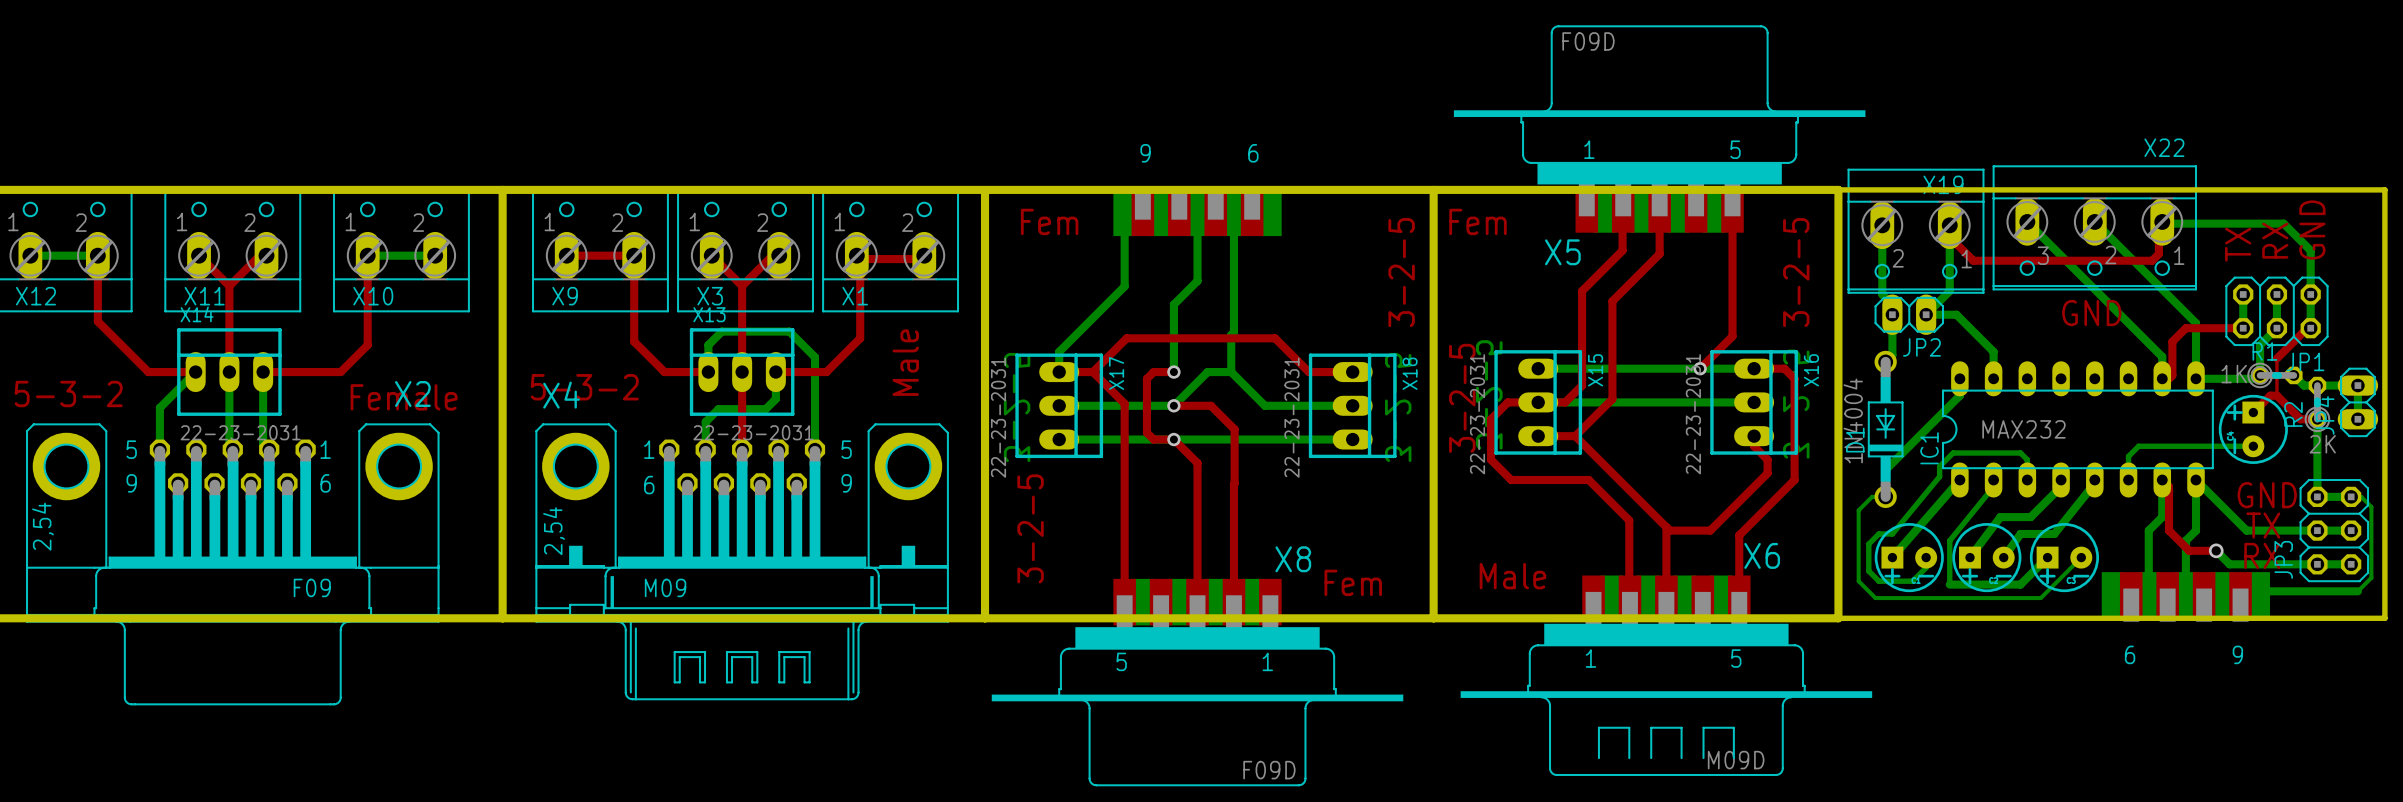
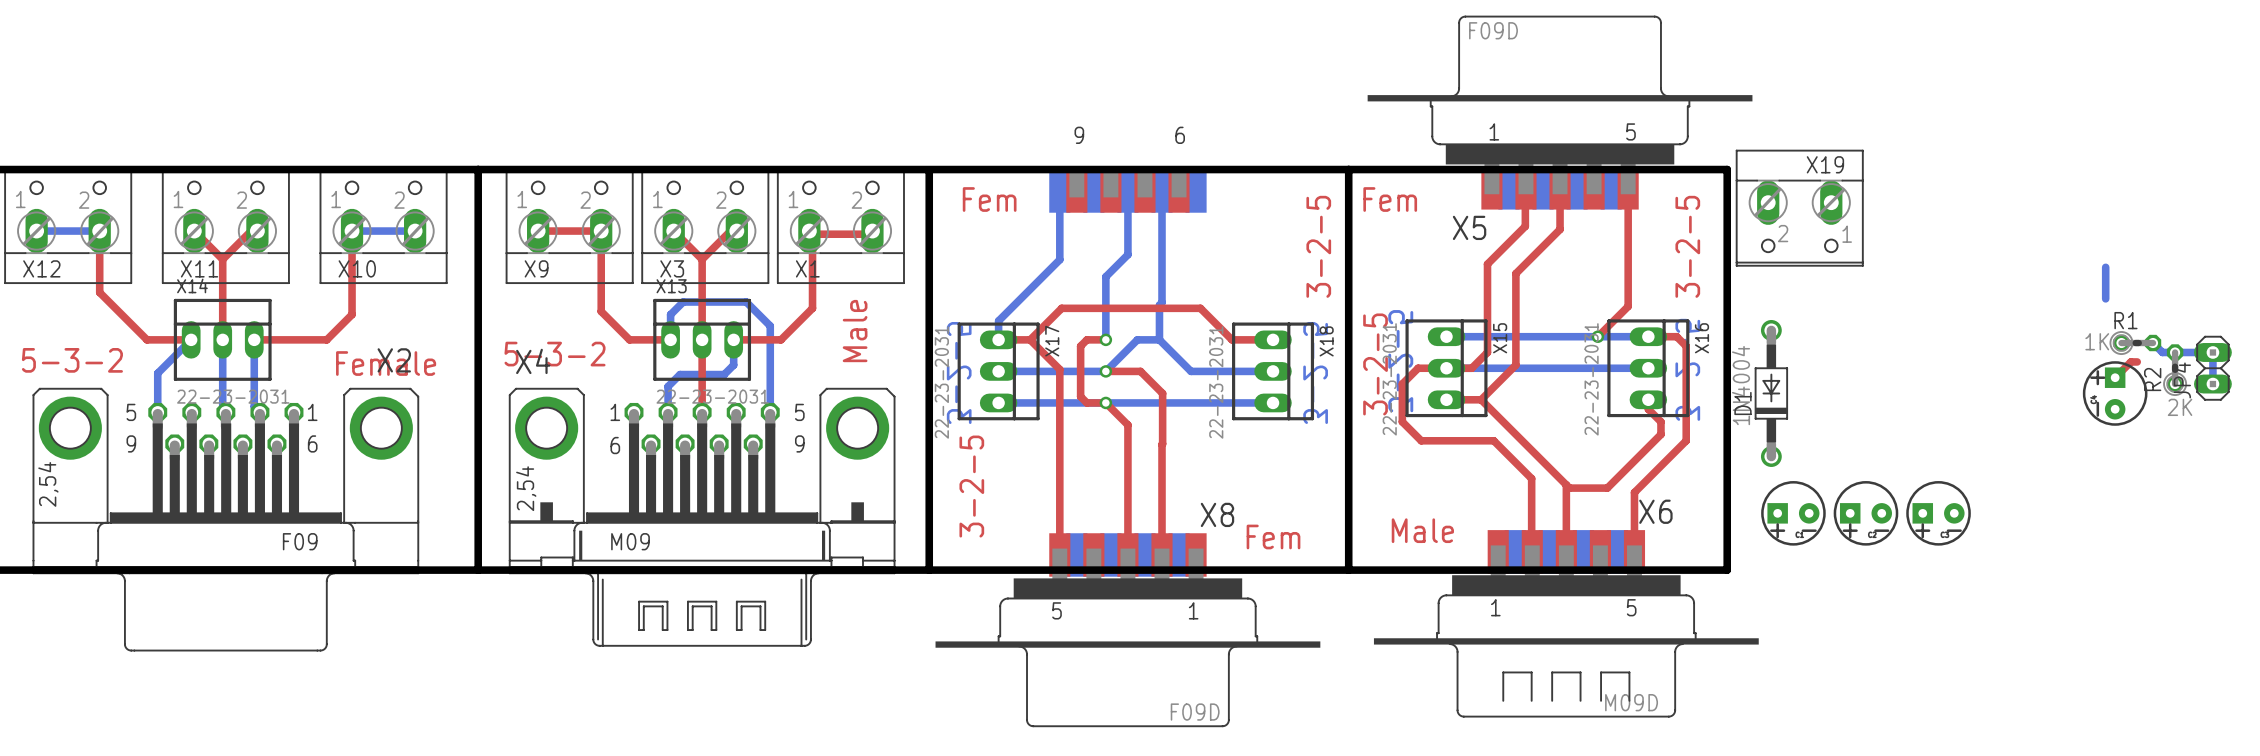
board edge: (1838, 189) (2384, 189) (2384, 618) (1838, 618) -> none
bottom track: (2027, 221) (2162, 356) (2162, 378) -> none
bottom track: (2094, 221) (2196, 323) (2196, 378) (2256, 378) (2260, 375) (2260, 345) (2276, 328) (2276, 294) -> none
top track: (2162, 221) (2158, 225) (2158, 253) (2152, 260) (1973, 260) (1949, 237) (1949, 225) -> none
bottom track: (2162, 221) (2163, 223) (2283, 223) (2310, 250) (2310, 328) -> none
bottom track: (1882, 225) (1882, 294) (1892, 304) (1892, 355) (1885, 361) -> none
bottom track: (1949, 225) (1949, 291) (1926, 314) (1956, 314) (1993, 351) (1993, 378) -> none
X22: (2094, 227) -> none
text: GND (2312, 230) -> none
text: RX (2275, 240) -> none
text: TX (2238, 244) -> none
JP1: (2276, 311) -> none
text: GND (2091, 313) -> none
JP2: (1909, 314) -> none
top track: (2243, 328) (2185, 328) (2172, 341) (2172, 375) (2169, 378) (2162, 378) -> none
top track: (2310, 328) (2307, 328) (2276, 358) (2276, 395) (2300, 419) (2317, 419) -> none
bottom track: (1959, 378) (1959, 395) (1885, 469) (1885, 496) (1872, 496) (1858, 510) (1858, 581) (1875, 598) (2040, 598) (2081, 557) -> none
bottom track: (2317, 419) (2317, 496) (2361, 496) (2371, 506) (2371, 577) (2357, 591) (2262, 591) (2258, 595) -> none
IC1: MAX232 (2077, 429) -> none
bottom track: (2253, 446) (2138, 446) (2128, 456) (2128, 480) -> none
bottom track: (1959, 480) (1892, 557) -> none
bottom track: (1993, 480) (1993, 486) (1949, 540) (1949, 584) (2020, 584) (2047, 557) -> none
bottom track: (2027, 480) (2027, 459) (2020, 453) (1953, 453) (1939, 466) (1939, 476) (1892, 533) (1878, 533) (1868, 544) (1868, 571) (1878, 581) (1912, 581) (1926, 567) (1926, 557) -> none
bottom track: (2061, 480) (2061, 486) (2030, 517) (2000, 517) (1969, 557) -> none
bottom track: (2094, 480) (2094, 483) (2054, 533) (2020, 533) (2003, 557) -> none
top track: (2162, 480) (2169, 486) (2169, 530) (2189, 550) (2216, 550) -> none
bottom track: (2162, 480) (2162, 517) (2148, 530) (2149, 595) -> none
text: GND (2267, 495) -> none
text: TX (2263, 525) -> none
JP3: (2334, 530) -> none
bottom track: (2351, 530) (2246, 530) (2196, 480) (2196, 530) (2185, 540) (2185, 595) -> none
bottom track: (2216, 550) (2229, 564) (2351, 564) -> none
via: (2216, 550) -> none
text: RX (2262, 555) -> none
part: (2185, 596) -> none

